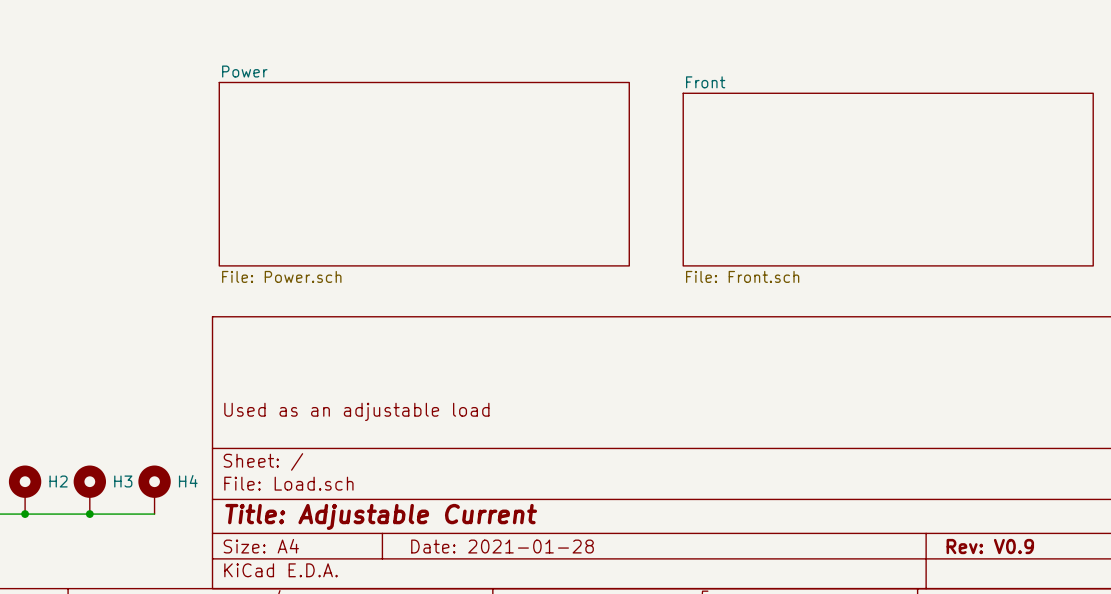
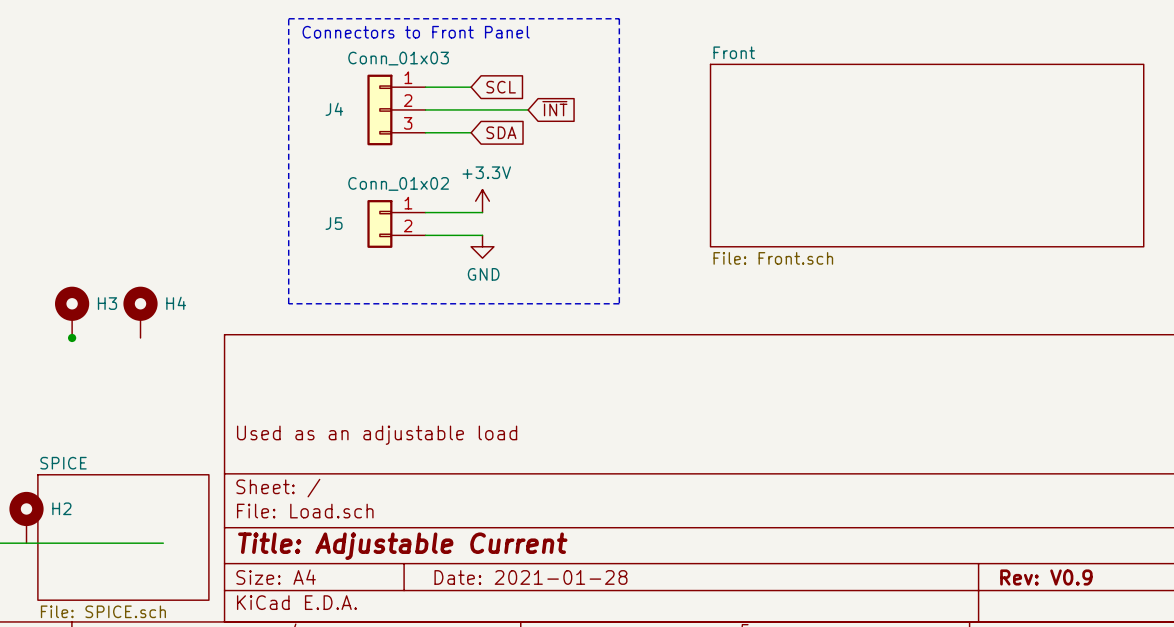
line: none -> (288, 18) (619, 18) (619, 303) (288, 303) (288, 18)
text: none -> Connectors to Front Panel (416, 32)
global label: none -> SCL (501, 87)
global label: none -> ~{INT} (554, 108)
J4: none -> Conn_01x03 (396, 109)
wire: none -> (425, 109) (528, 109)
wire: none -> (425, 132) (471, 132)
global label: none -> SDA (501, 132)
sheet Power: File: Power.sch (424, 174) -> none
sheet Front position: (888, 179) -> (927, 155)
power symbol: none -> +3.3V (482, 201)
wire: none -> (425, 212) (482, 212)
J5: none -> Conn_01x02 (396, 223)
wire: none -> (425, 235) (482, 235)
power symbol: none -> GND (482, 246)
junction: none -> (72, 337)
H3 position: (89, 489) -> (72, 312)
H4 position: (154, 489) -> (140, 312)
sheet SPICE: none -> File: SPICE.sch (123, 537)
junction: (25, 514) -> none
junction: (89, 514) -> none

